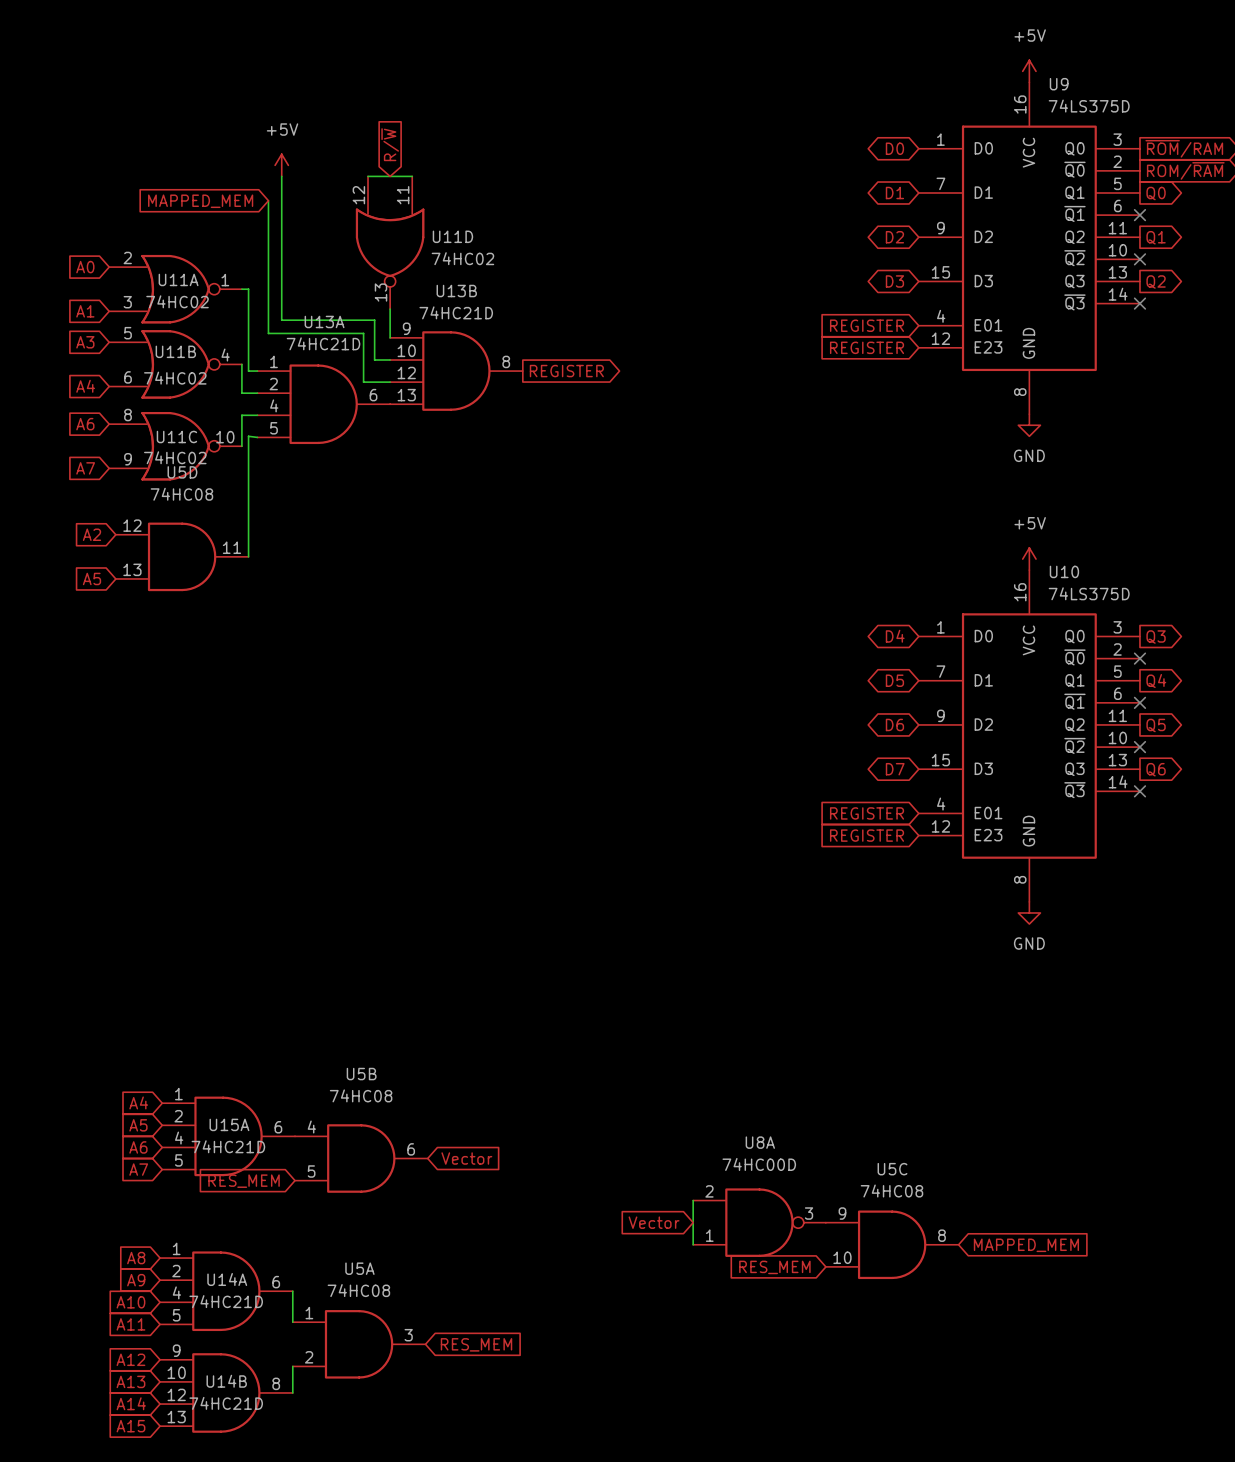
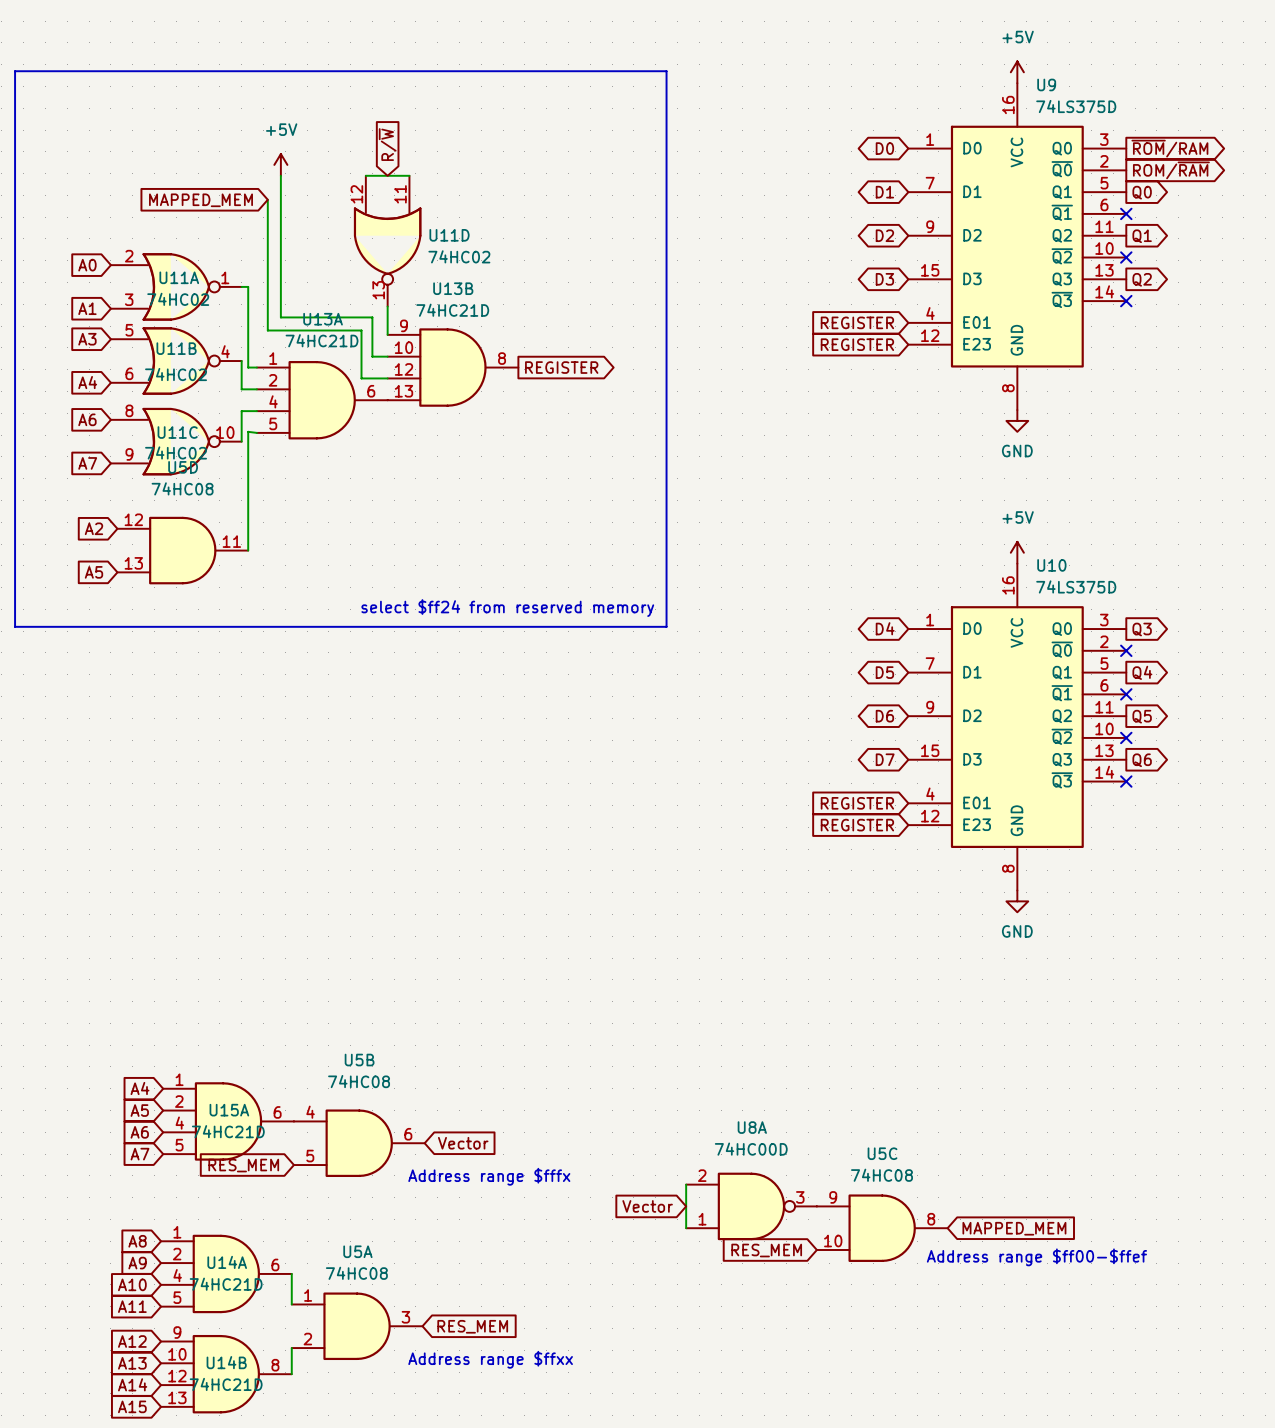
line: none -> (15, 71) (666, 71) (666, 626) (15, 626) (15, 71)
text: none -> select $ff24 from reserved memory (507, 608)
text: none -> Address range $fffx (489, 1176)
text: none -> Address range $ff00-$ffef (1036, 1257)
text: none -> Address range $ffxx (490, 1359)

